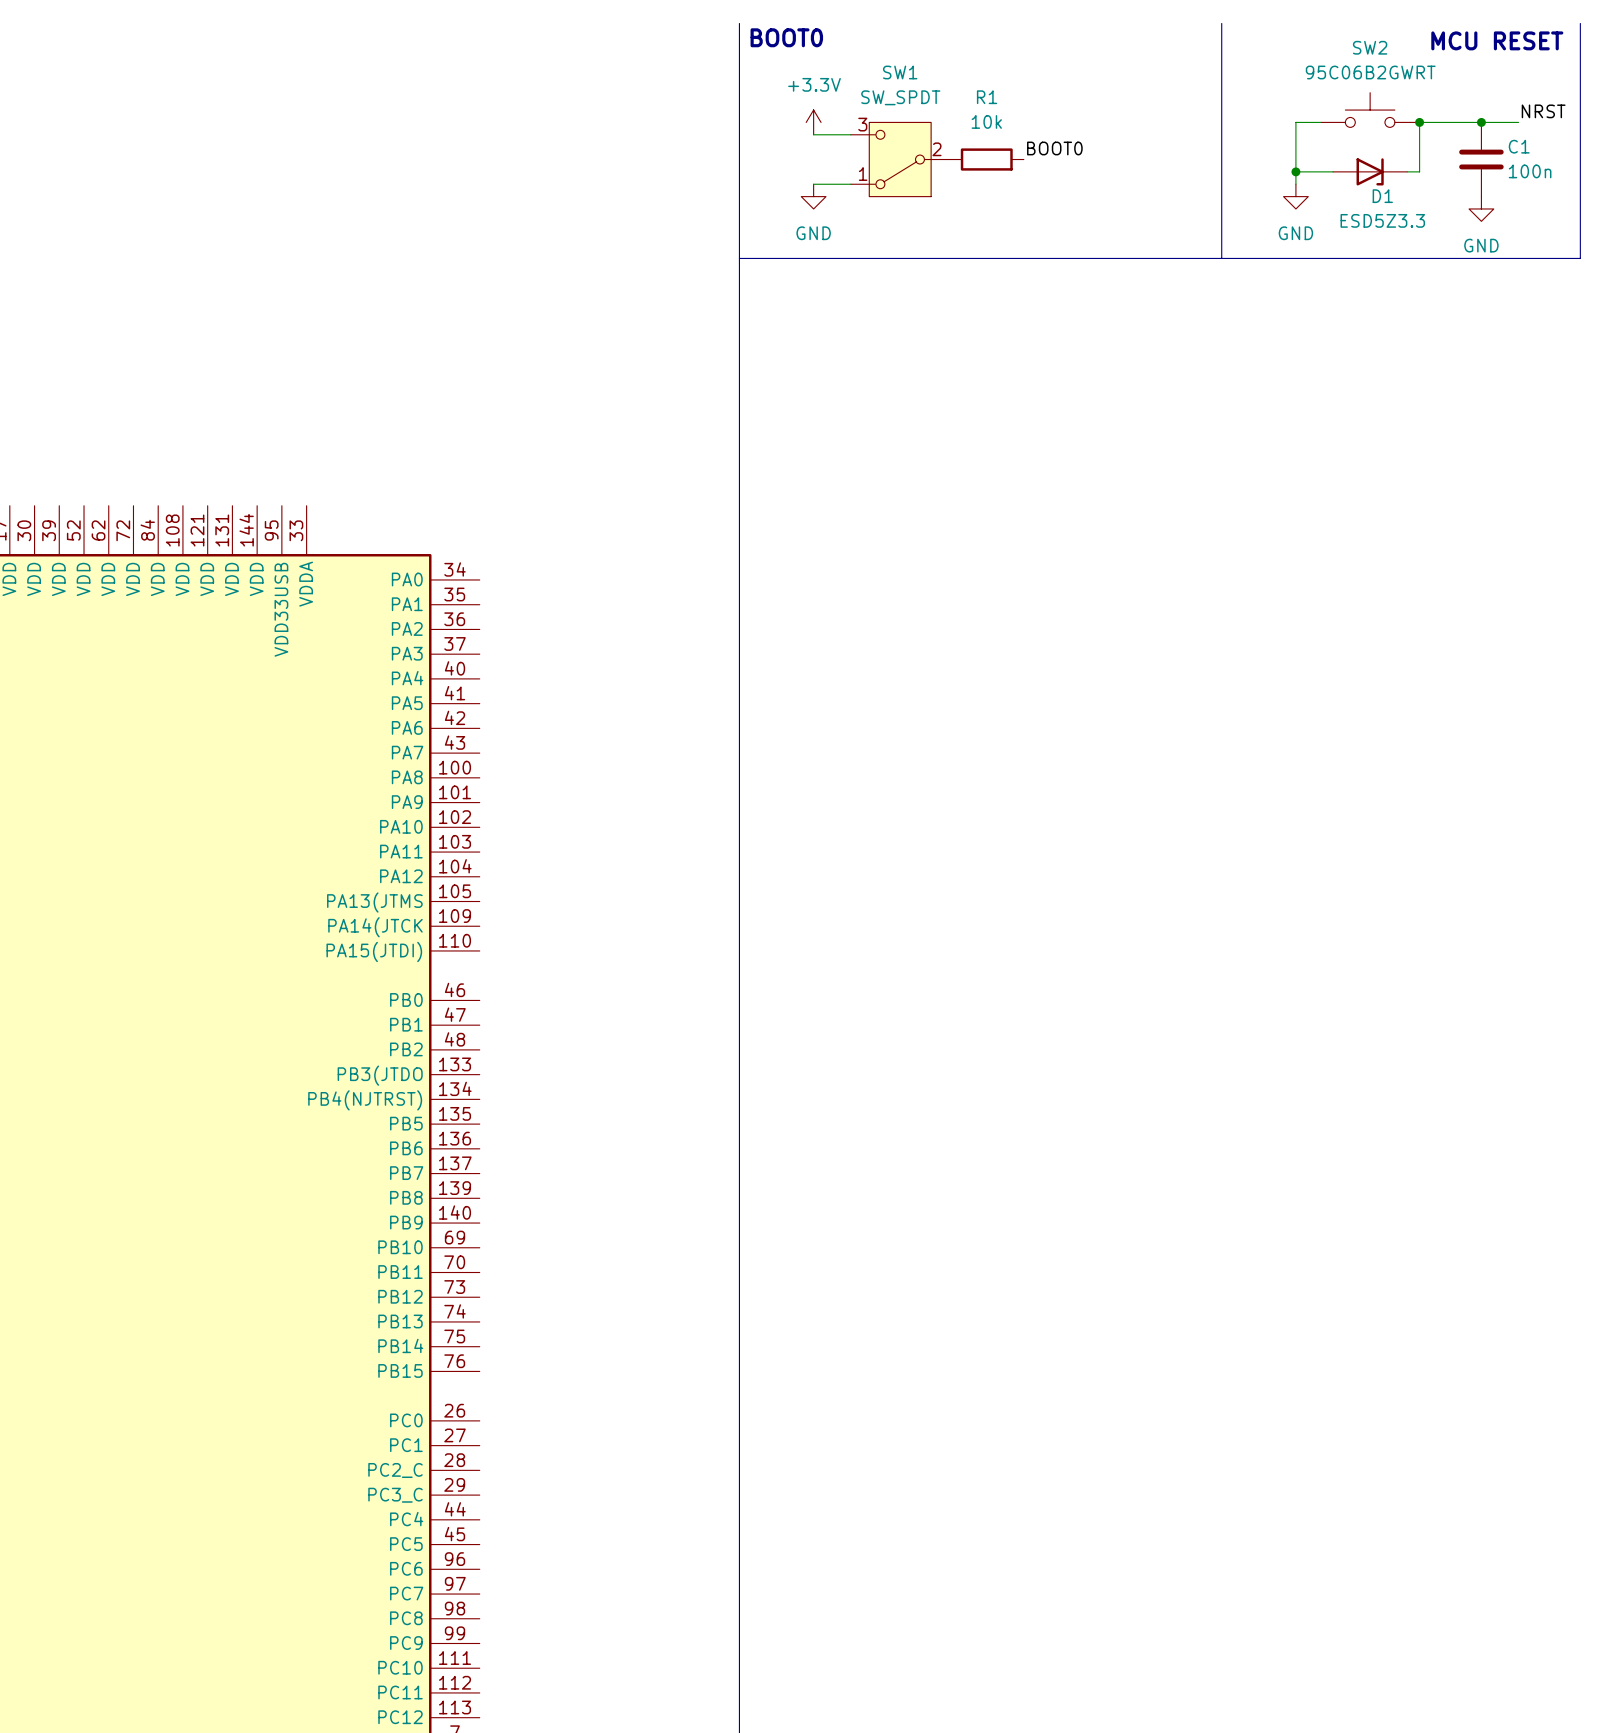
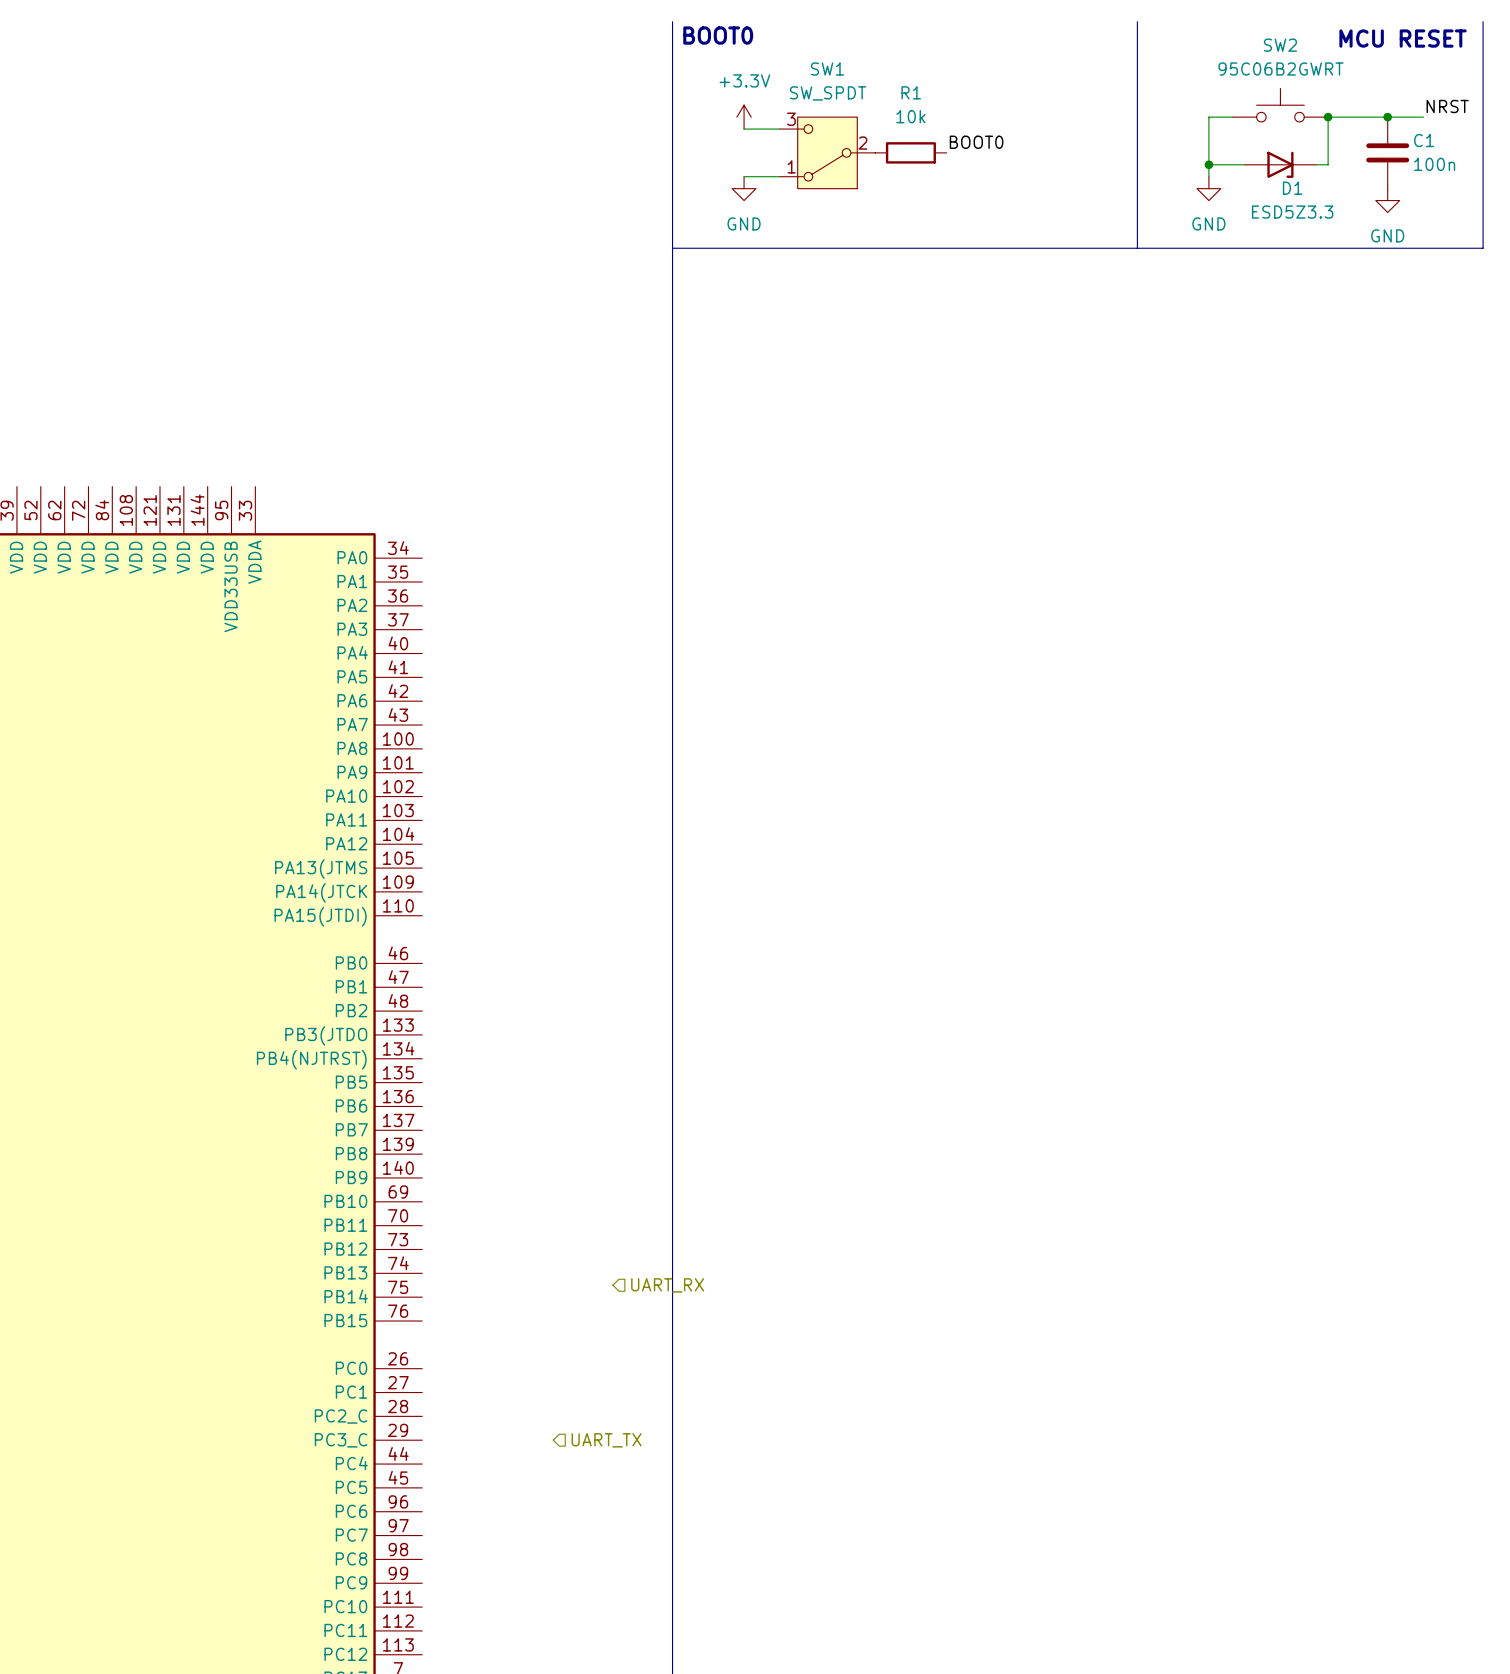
hierarchical label: none -> UART_RX (667, 1285)
hierarchical label: none -> UART_TX (606, 1440)

